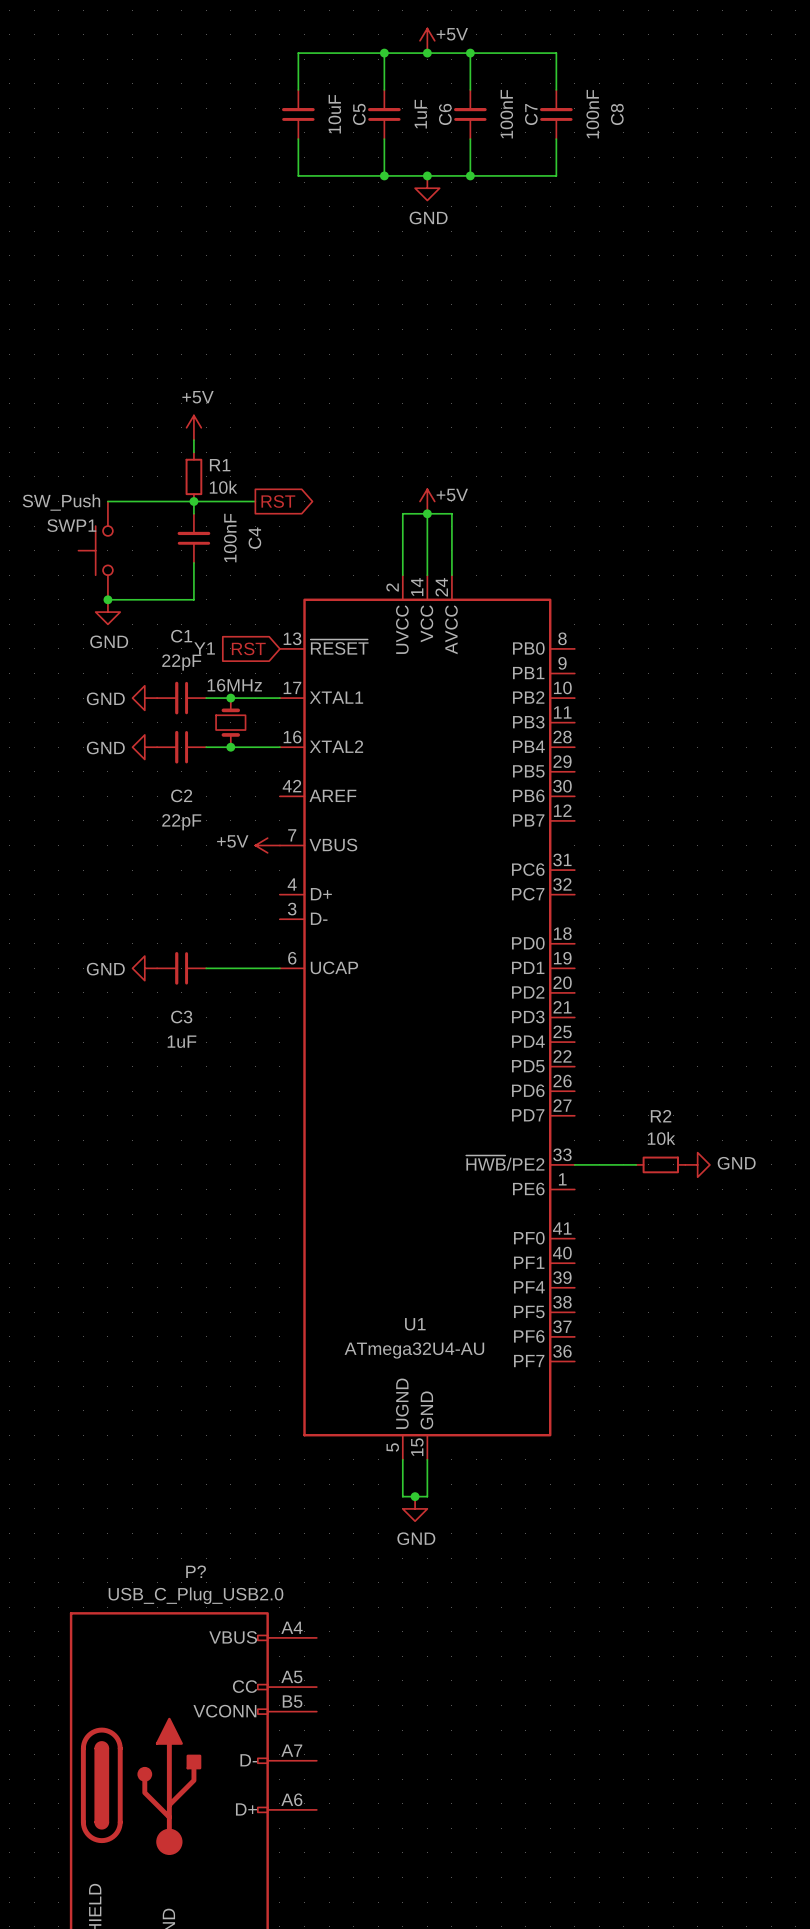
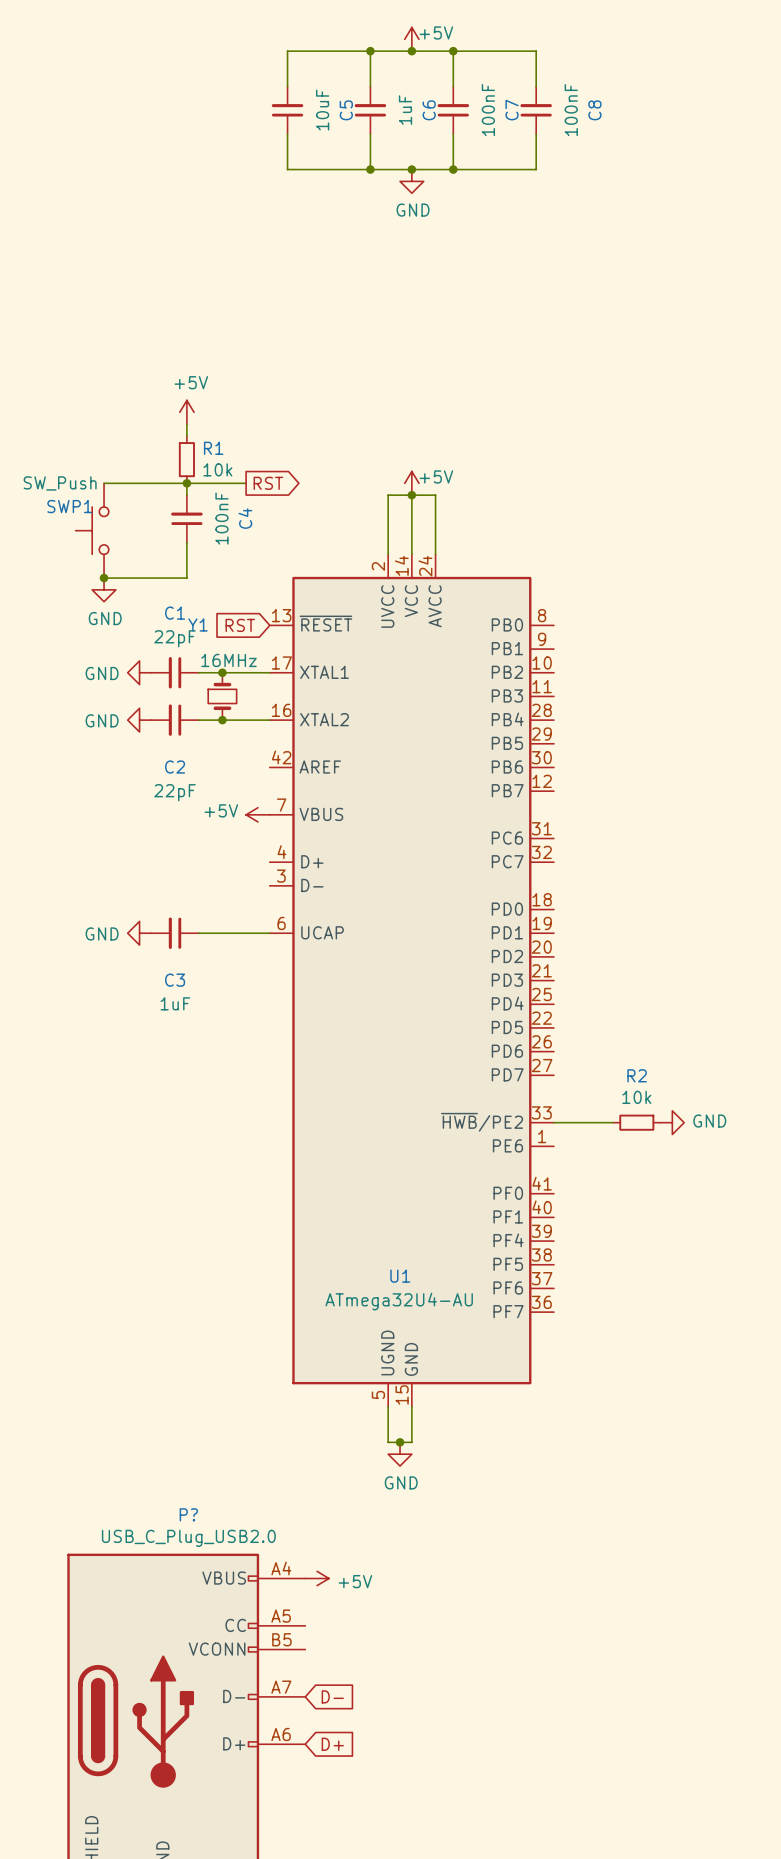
power symbol: none -> +5V (317, 1578)
global label: none -> D- (332, 1696)
global label: none -> D+ (332, 1744)

